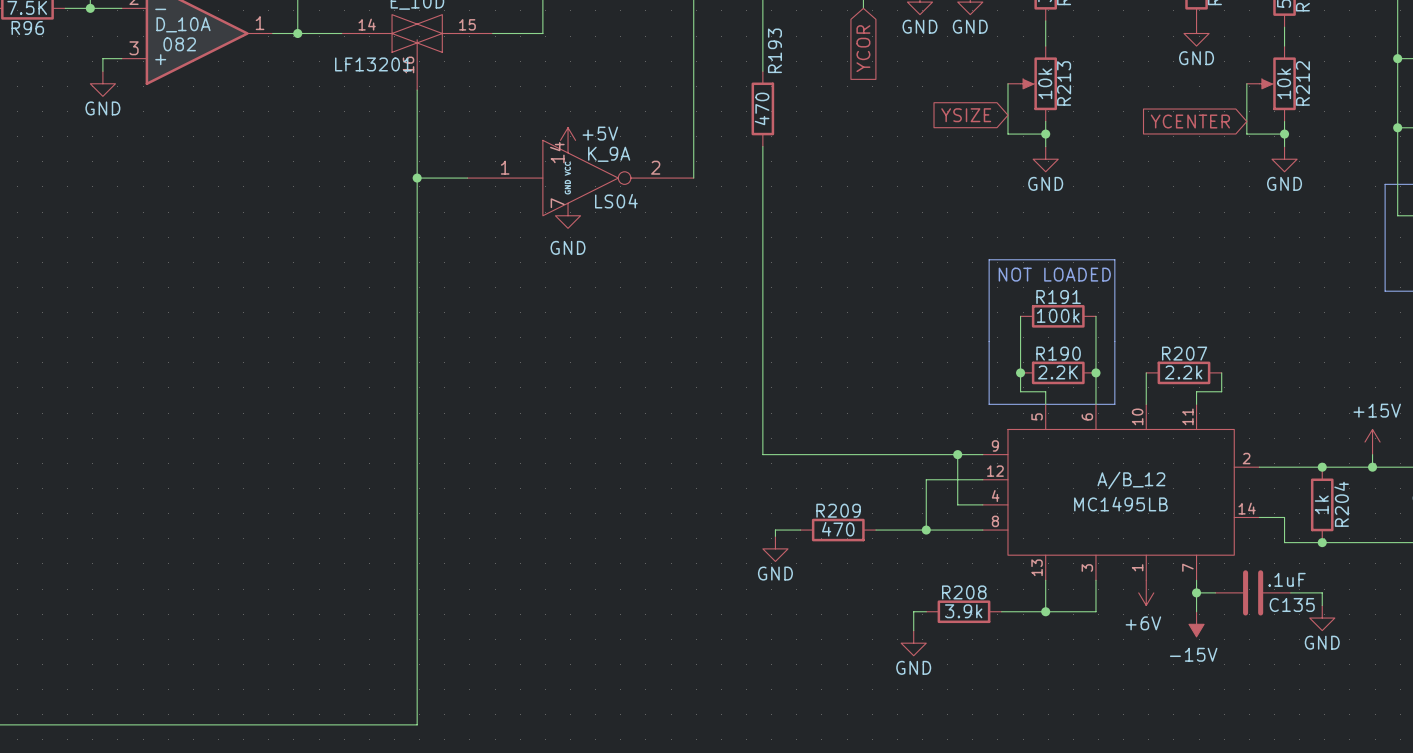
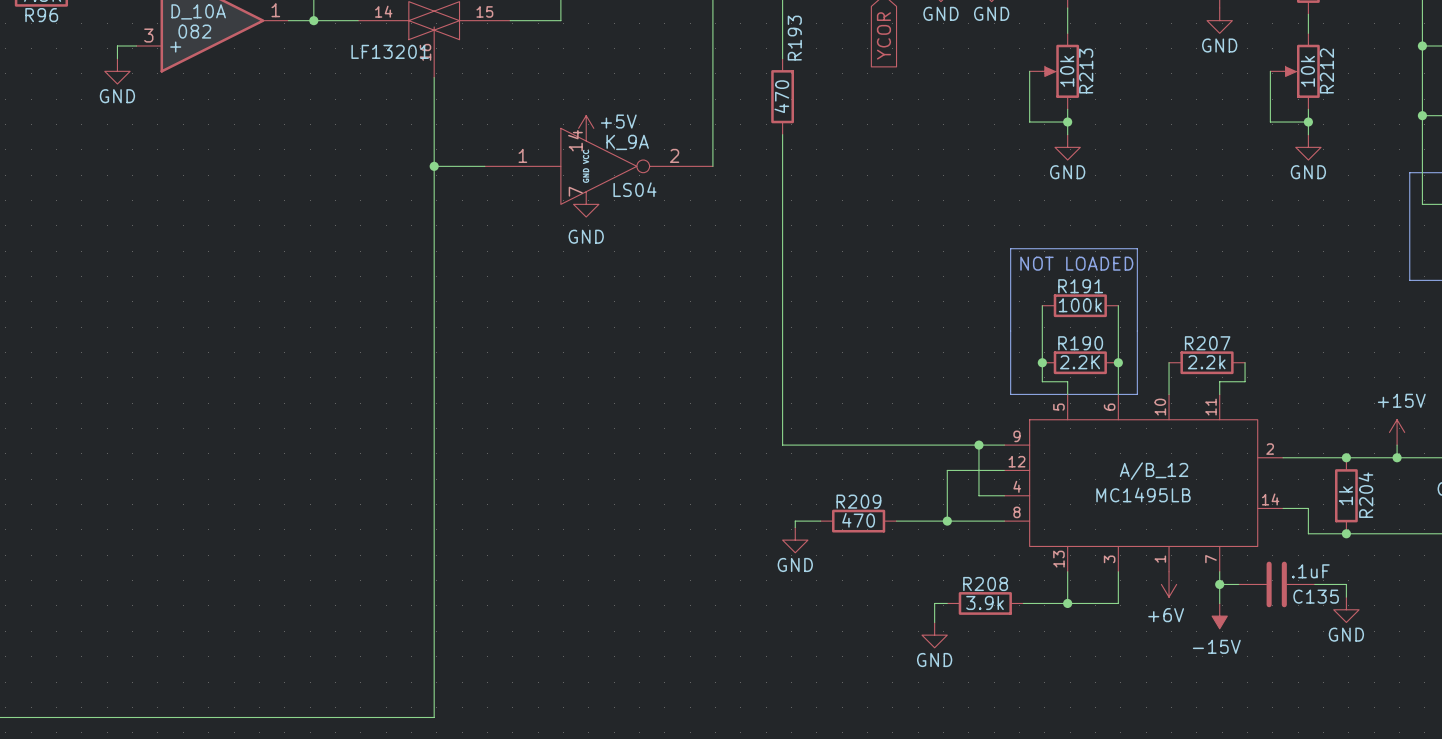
global label: YSIZE (966, 115) -> none
global label: YCENTER (1190, 121) -> none

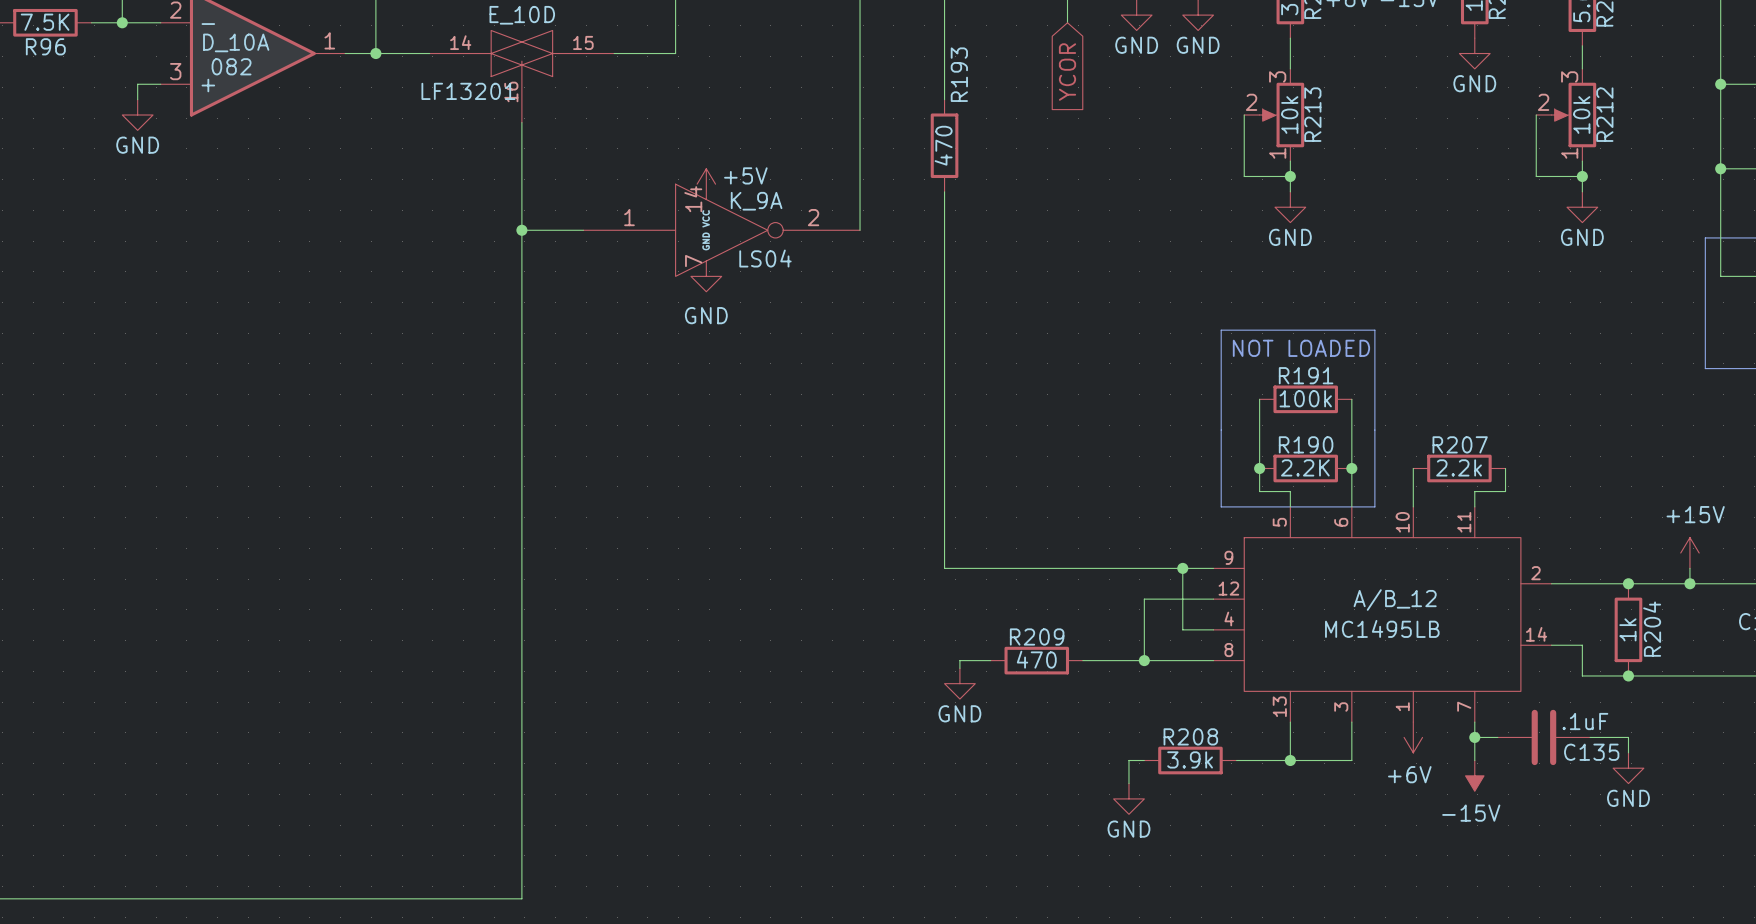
R213 pin number: none -> 3 (1277, 76)
R212 pin number: none -> 3 (1569, 76)
R213 pin number: none -> 2 (1251, 102)
R212 pin number: none -> 2 (1543, 102)
R213 pin number: none -> 1 (1277, 153)
R212 pin number: none -> 1 (1569, 153)

